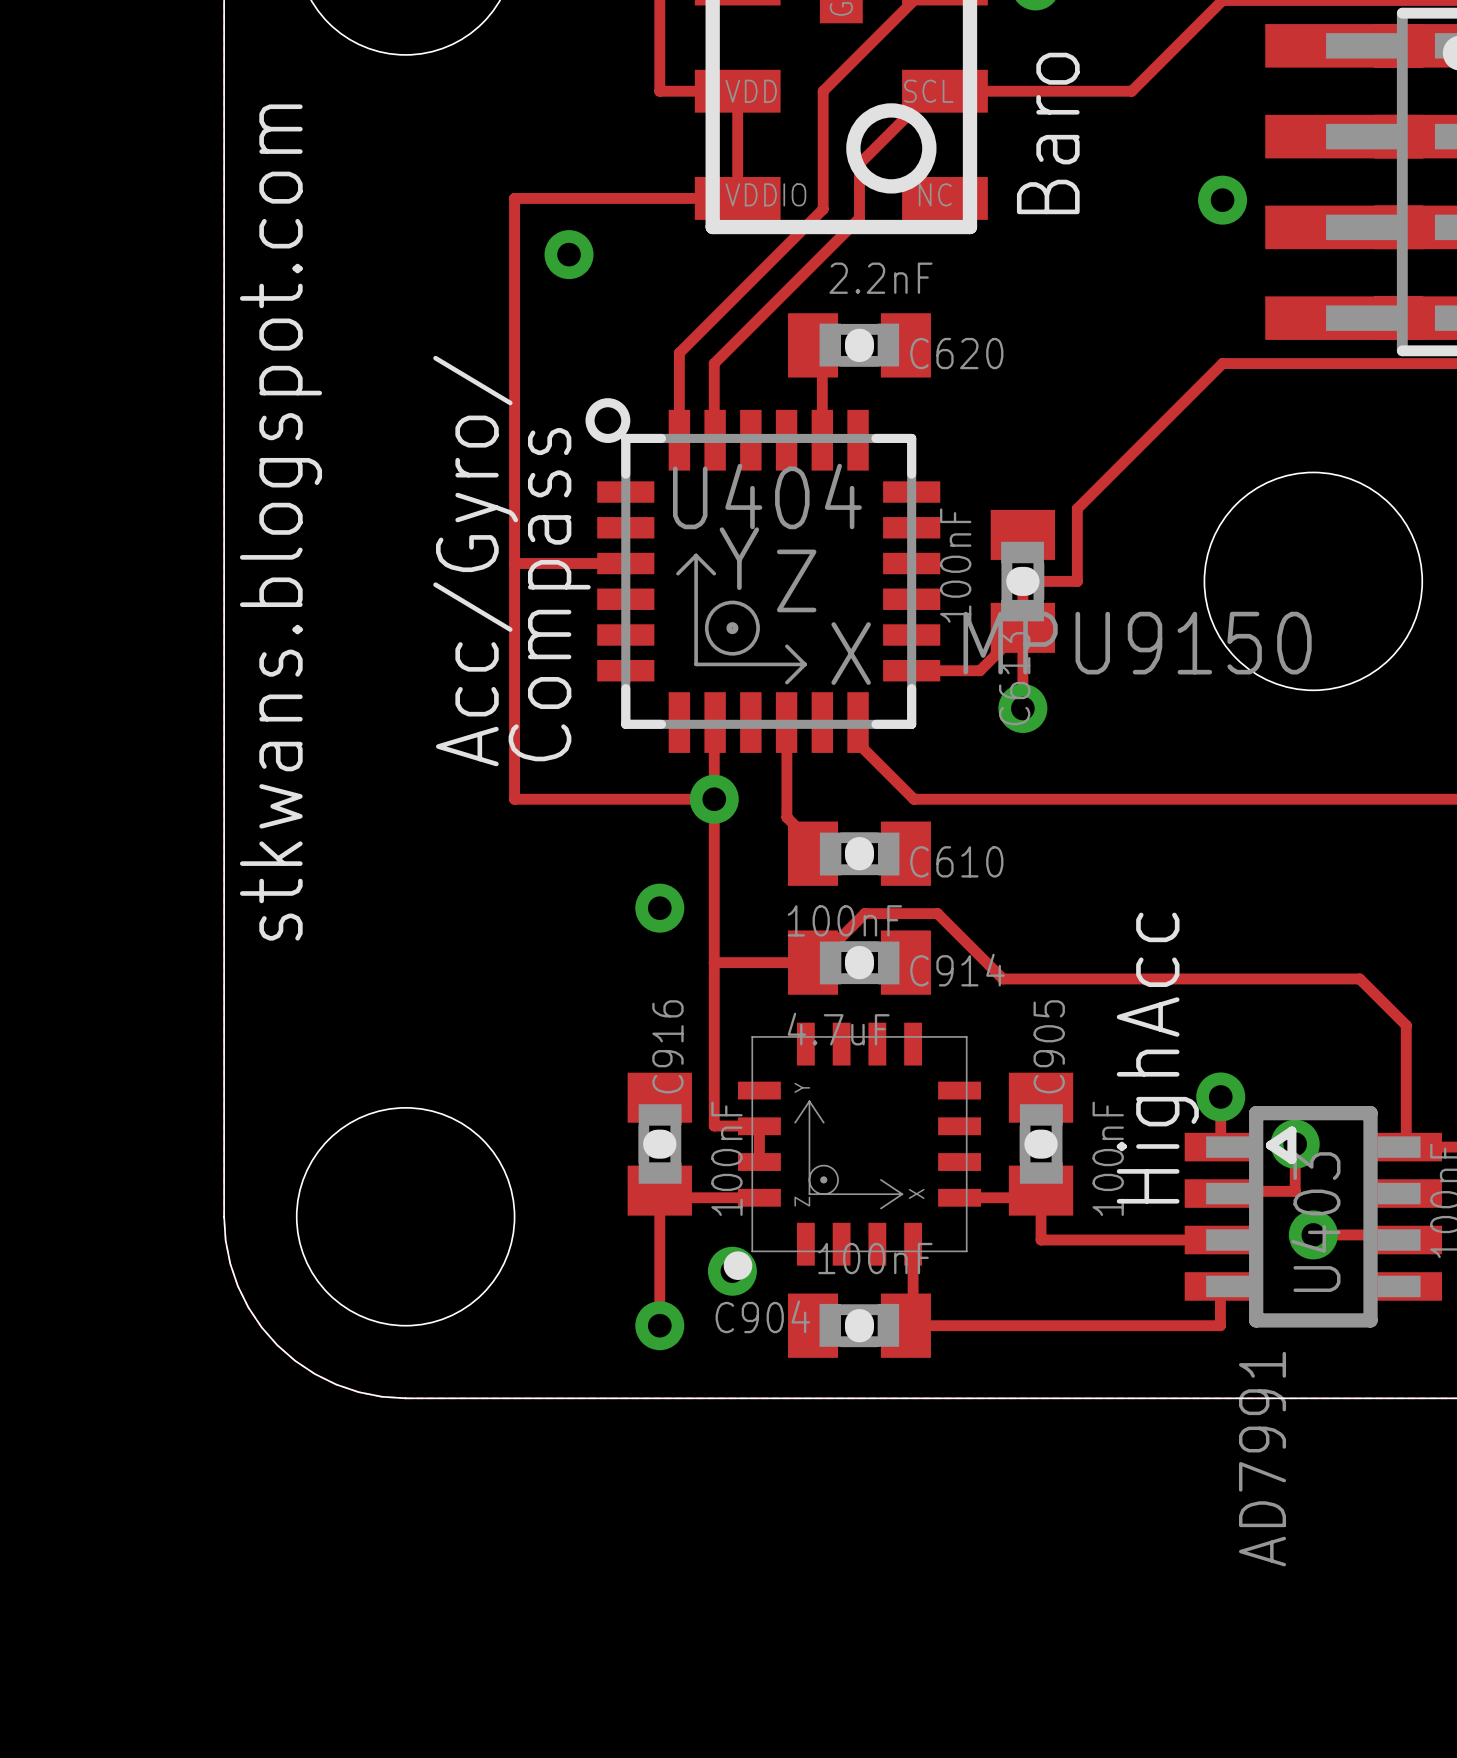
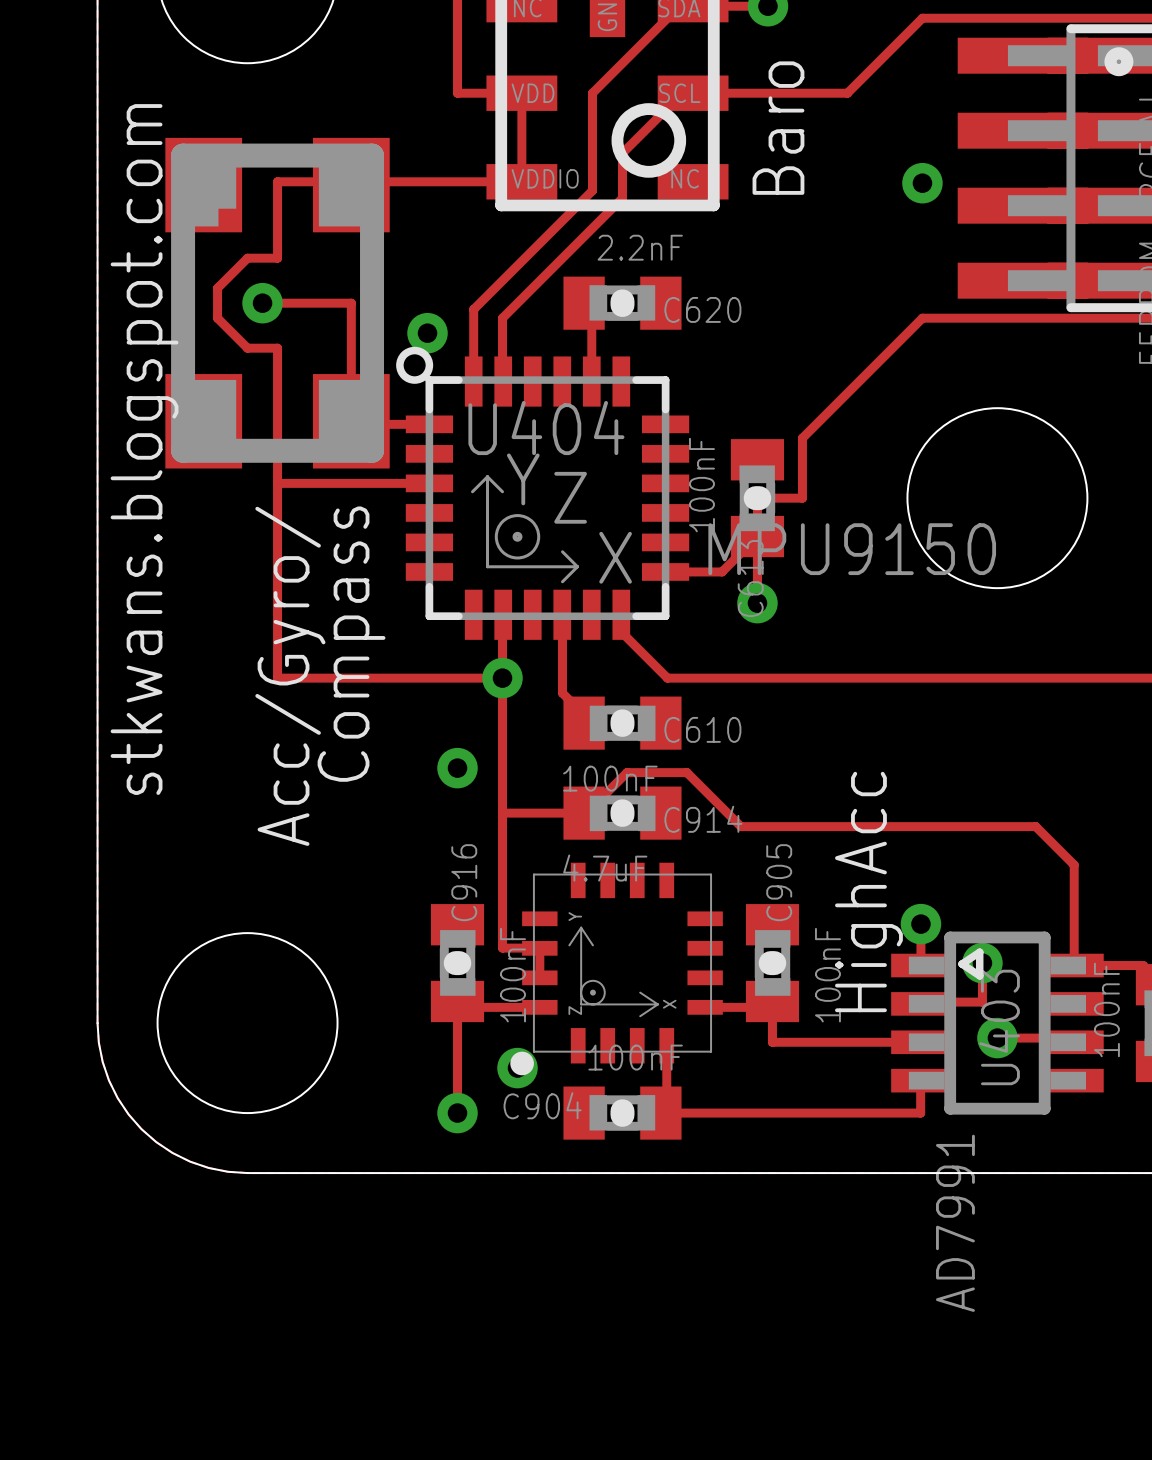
track: (514, 198) (514, 799) -> (337, 181) (277, 181) (277, 258) (247, 258) (217, 288) (217, 318) (247, 348) (277, 348) (277, 678) (337, 678)
via: (569, 254) -> none
track: none -> (262, 303) (351, 303) (351, 424) (429, 424)
via: none -> (262, 303)
part: none -> (277, 303)
via: none -> (427, 333)
text position: Acc/Gyro/ (475, 561) -> Acc/Gyro/ (290, 676)
track: none -> (277, 483) (337, 483)
text position: Compass (549, 594) -> Compass (351, 644)

